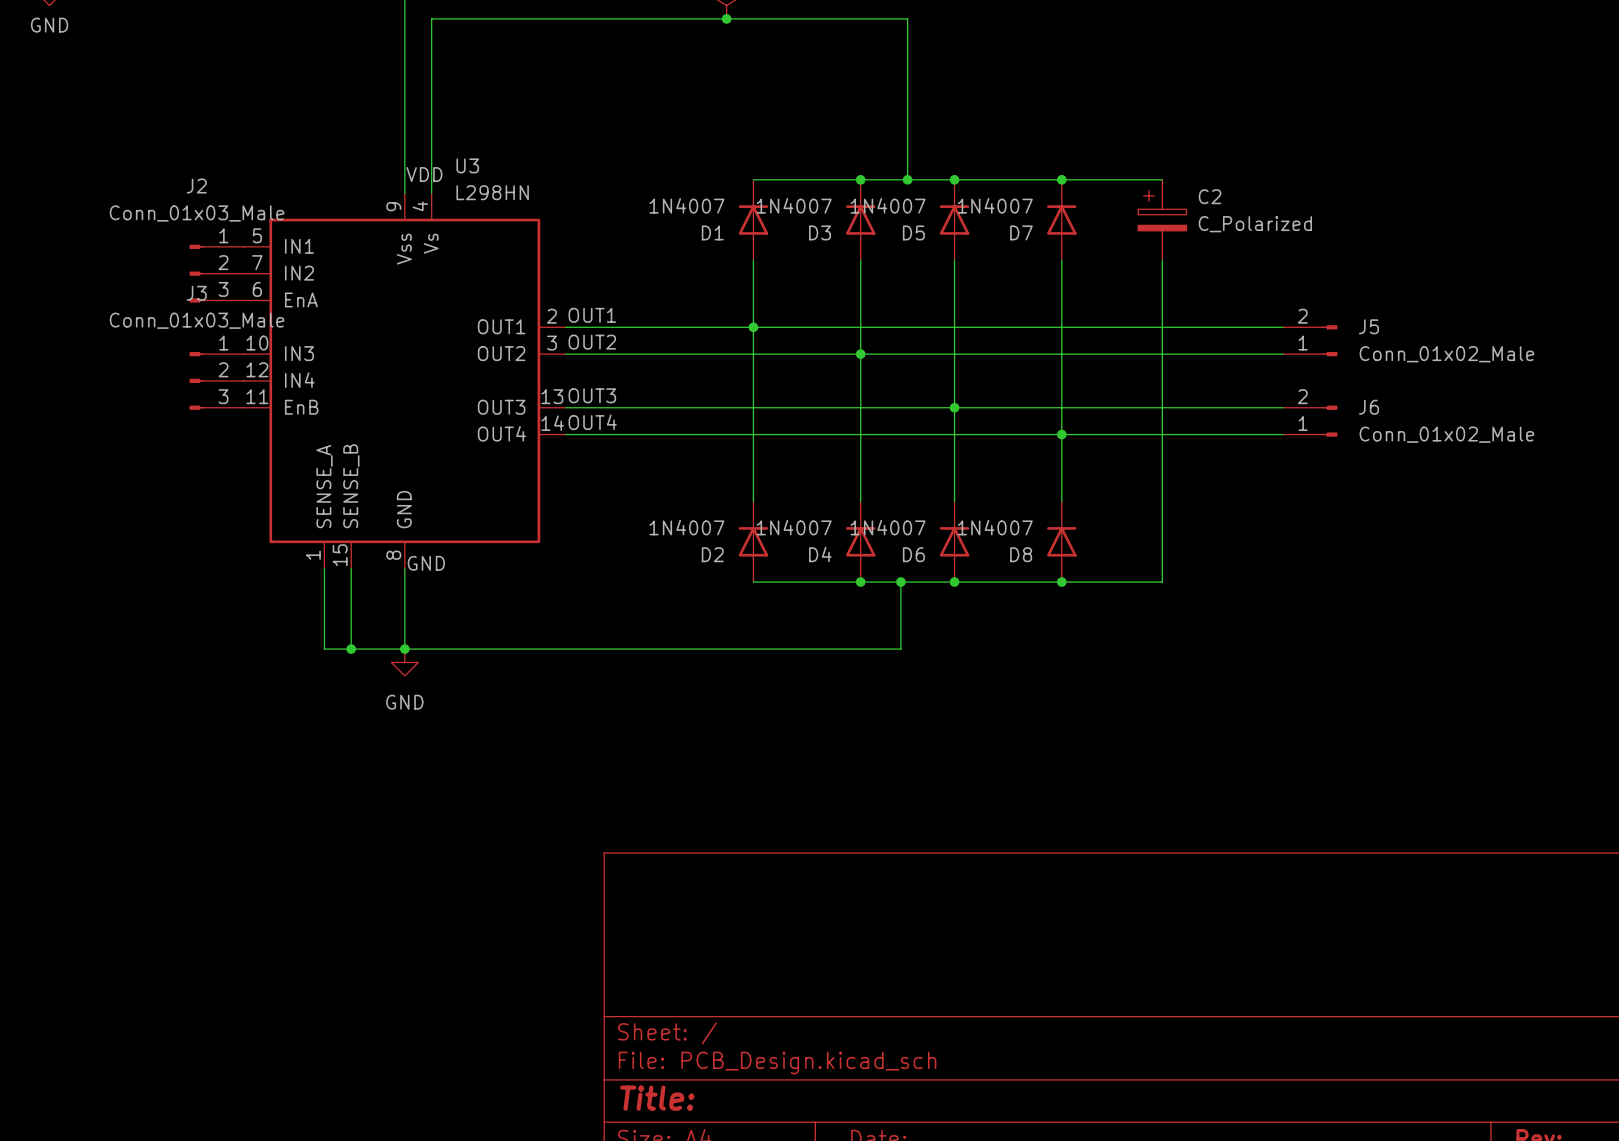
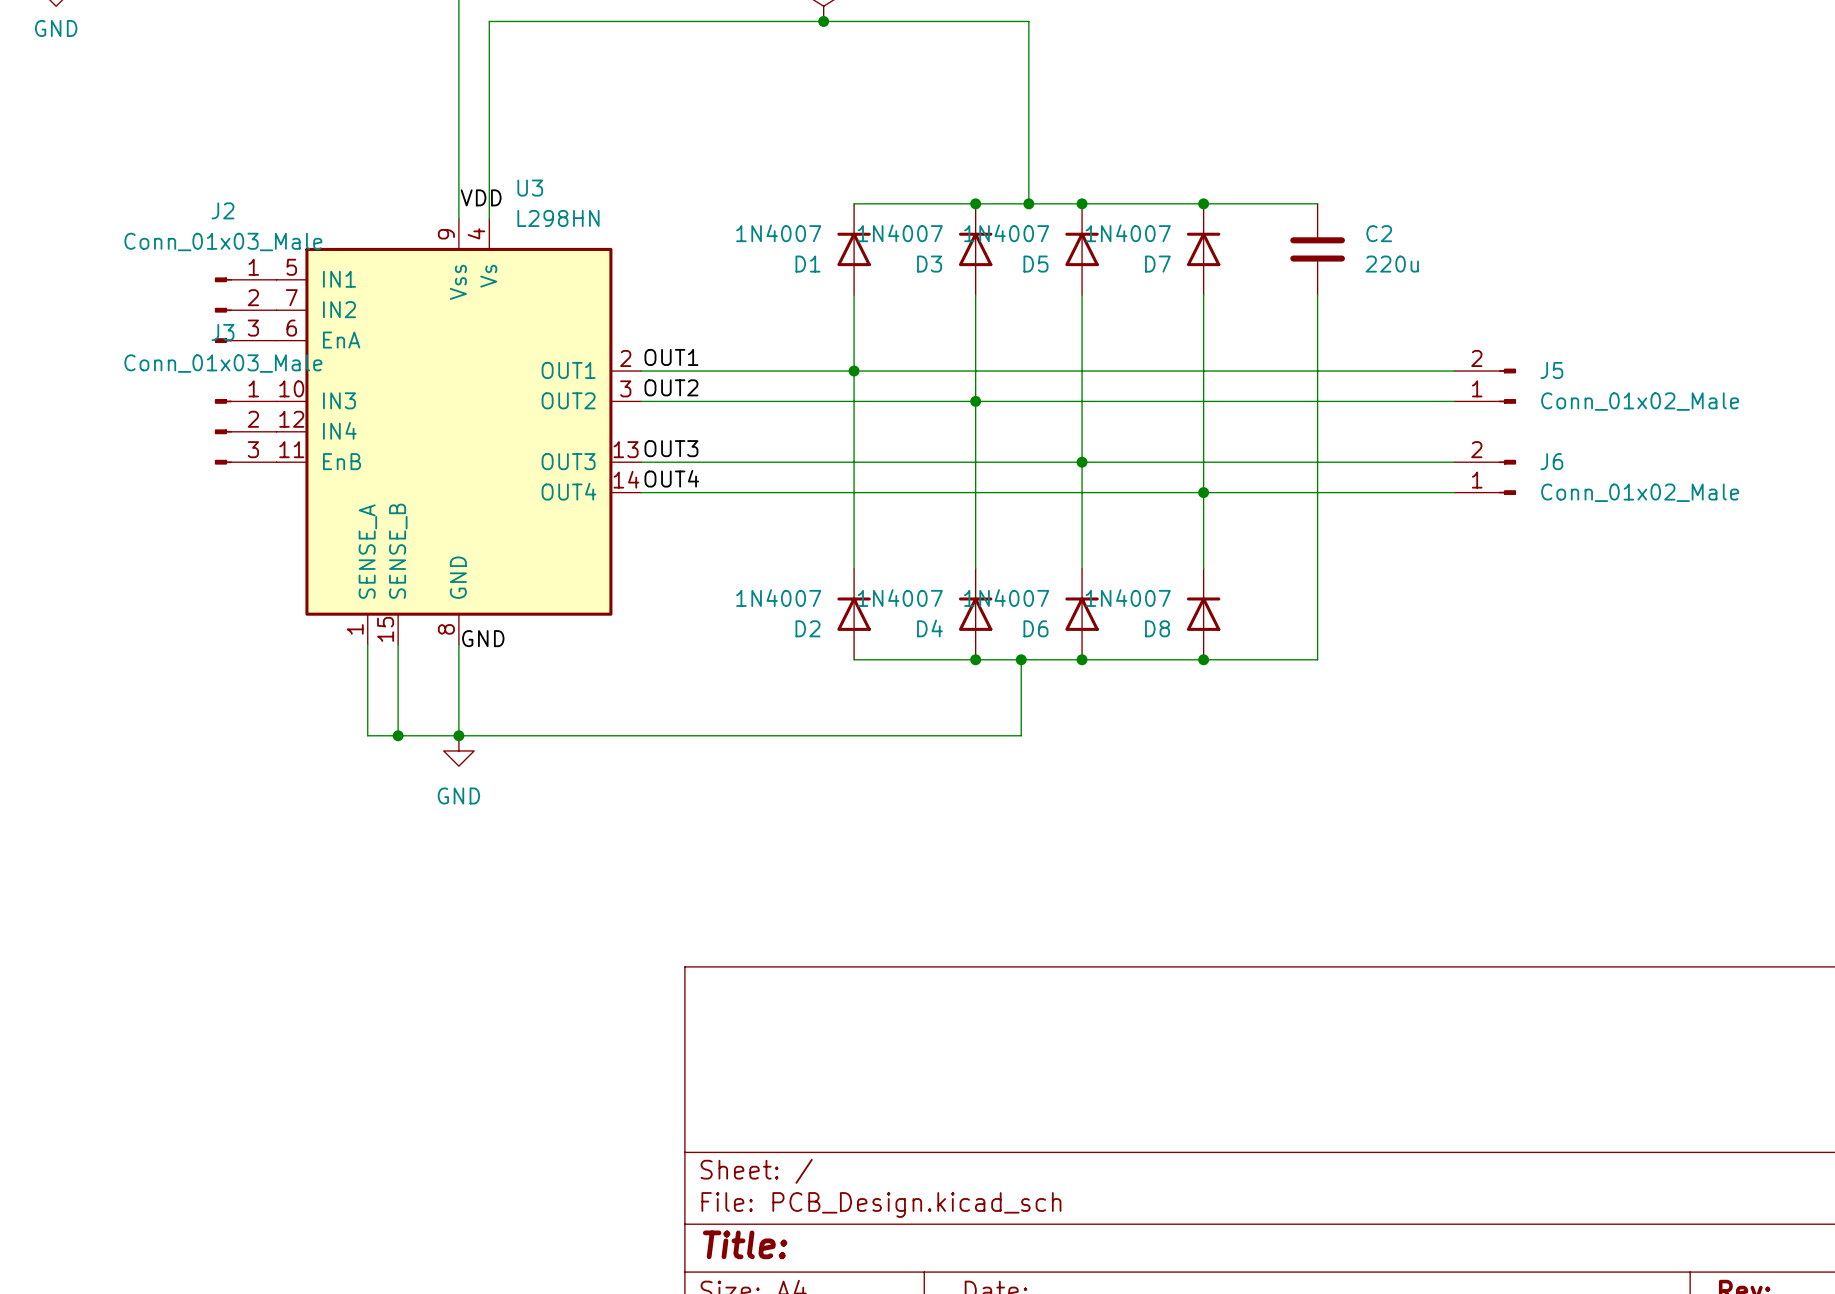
C2 symbol: [1138, 179, 1187, 261] -> [1290, 203, 1345, 296]
C2 value: C_Polarized (1255, 224) -> 220u (1392, 264)

